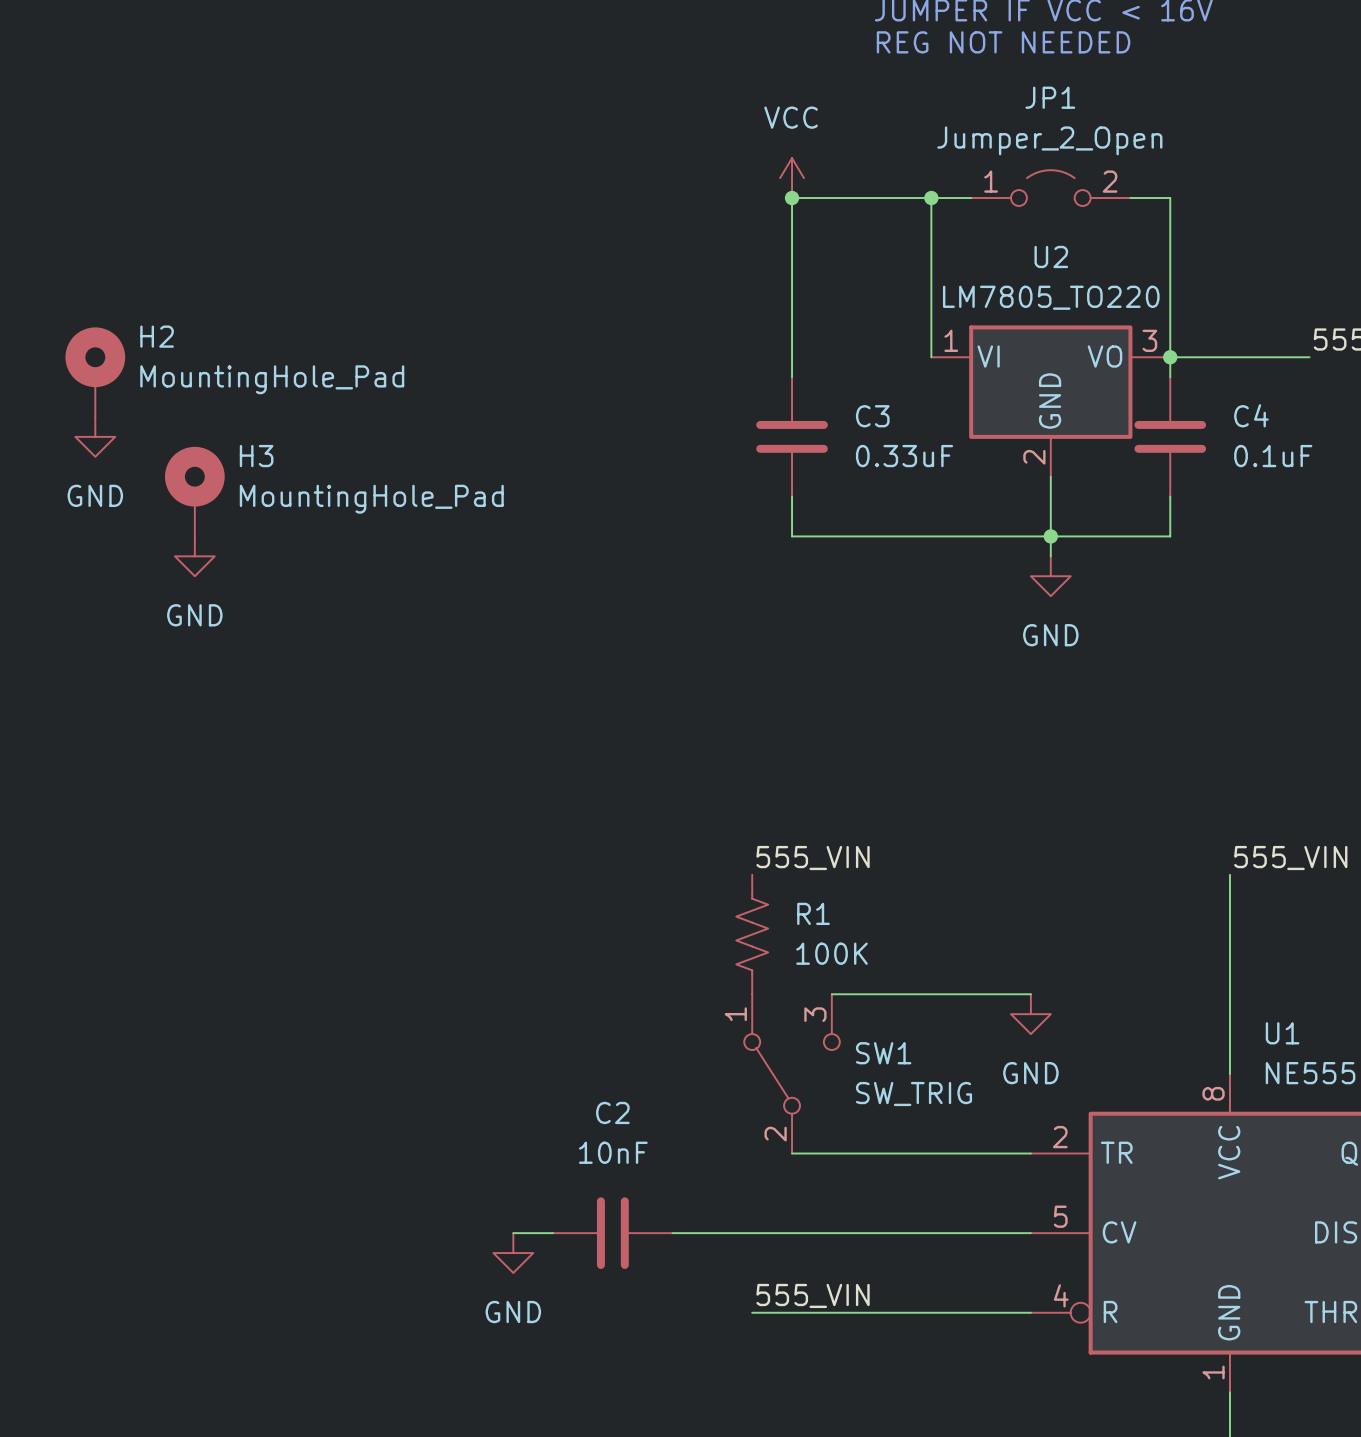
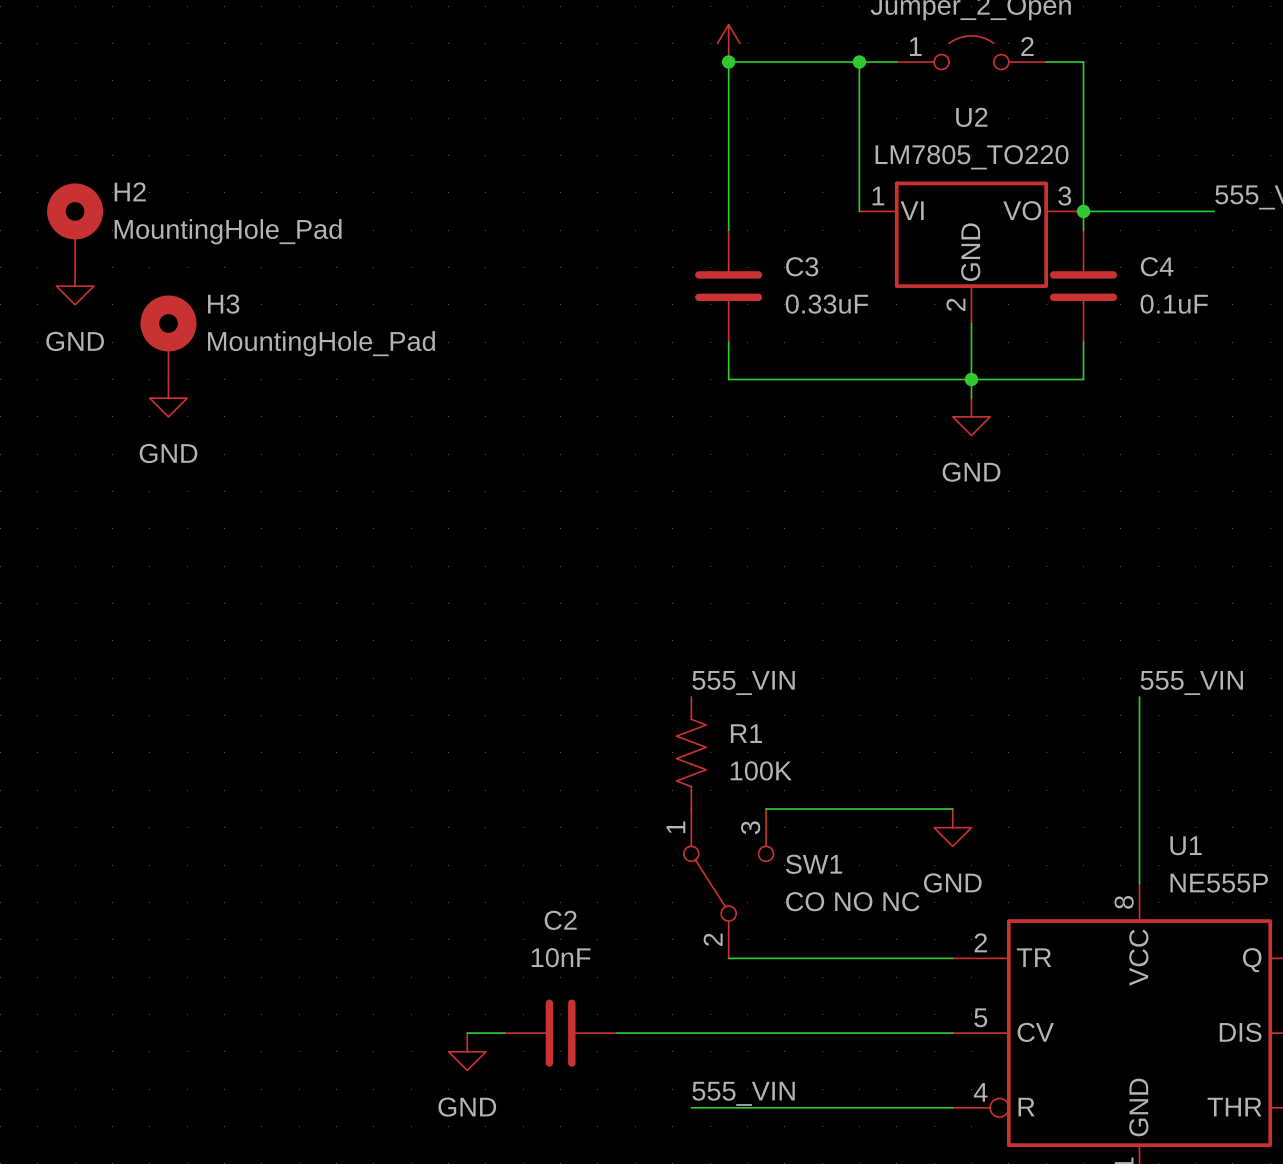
SW1 value: SW_TRIG (913, 1093) -> CO NO NC (852, 901)

